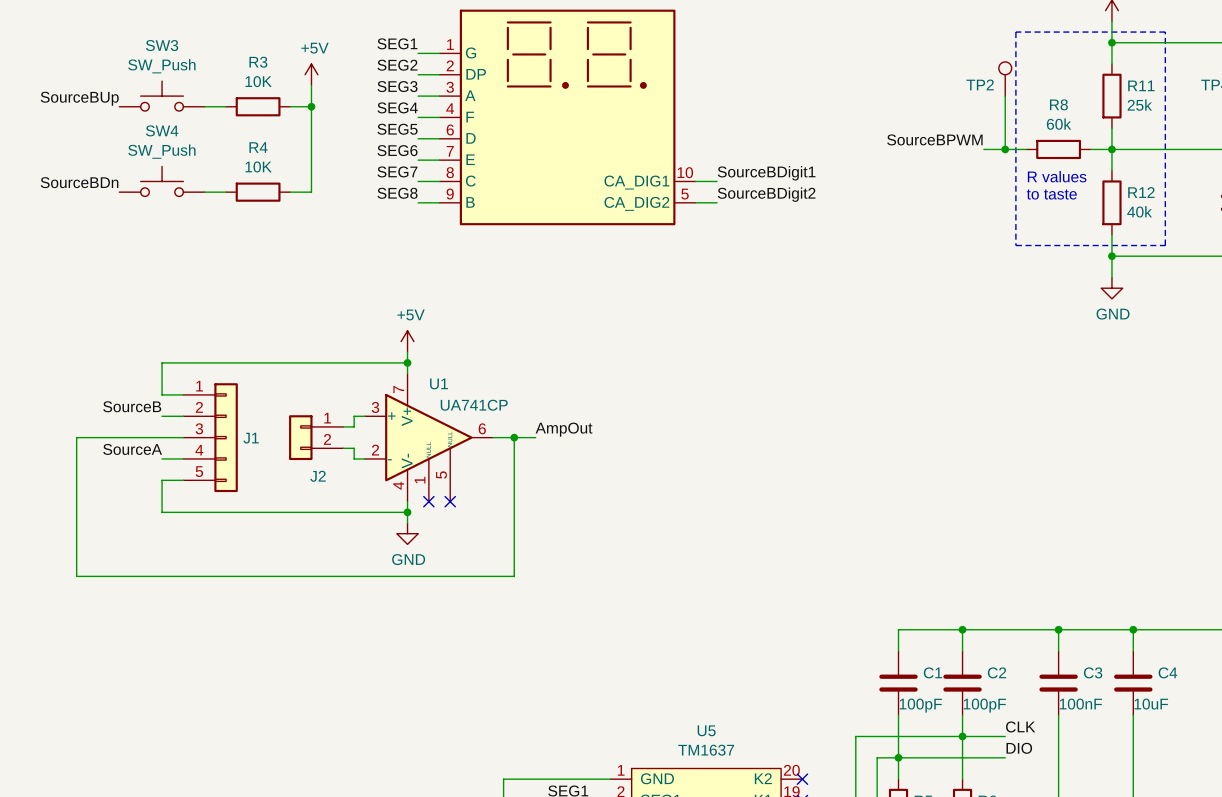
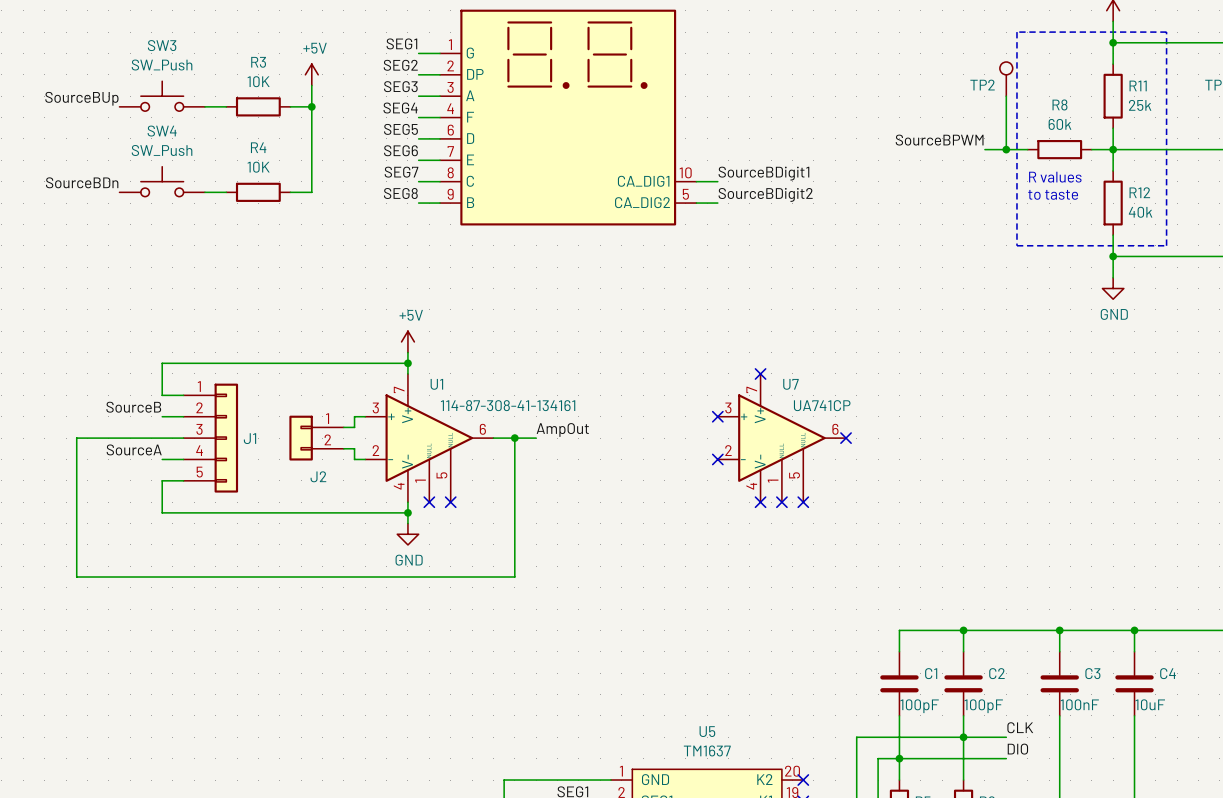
no-connect mark: none -> (760, 373)
U1 value: UA741CP (474, 405) -> 114-87-308-41-134161 (508, 405)
no-connect mark: none -> (717, 416)
U7: none -> UA741CP (781, 438)
no-connect mark: none -> (846, 438)
no-connect mark: none -> (717, 459)
no-connect mark: none -> (760, 502)
no-connect mark: none -> (781, 502)
no-connect mark: none -> (803, 502)

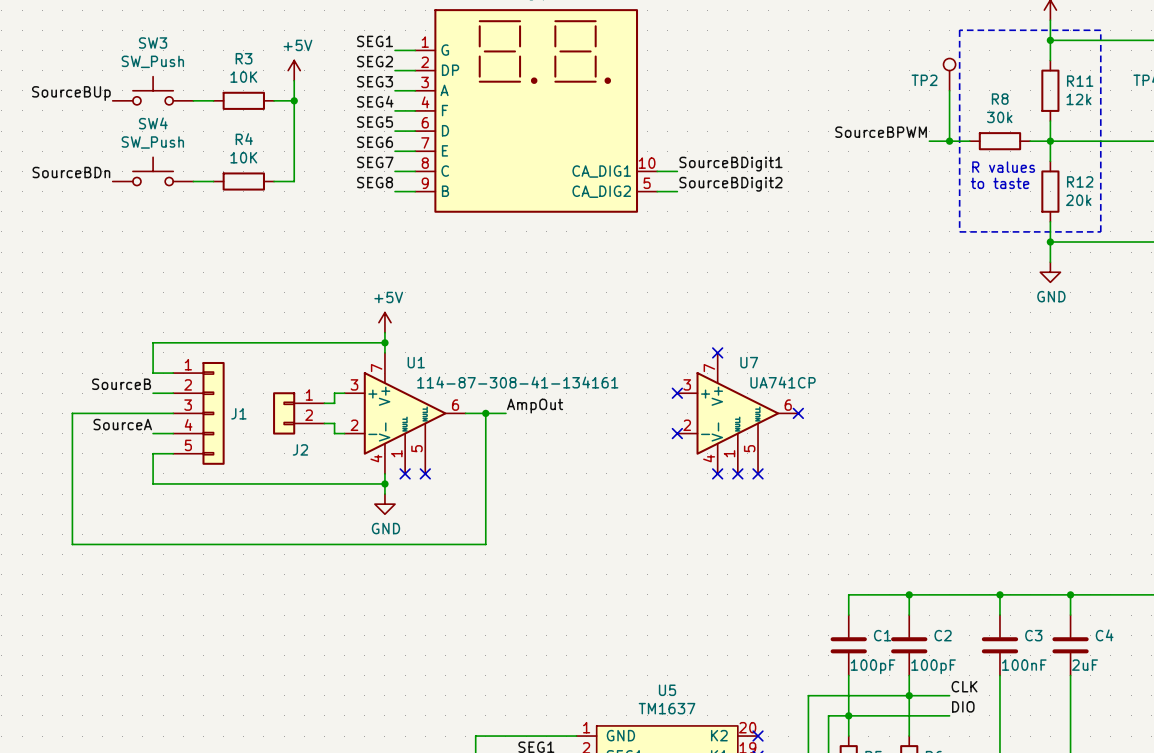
R11 value: 25k (1140, 105) -> 12k (1078, 99)
R8 value: 60k (1059, 124) -> 30k (999, 117)
R12 value: 40k (1140, 212) -> 20k (1078, 200)
C4 value: 10uF (1150, 704) -> 2uF (1085, 665)

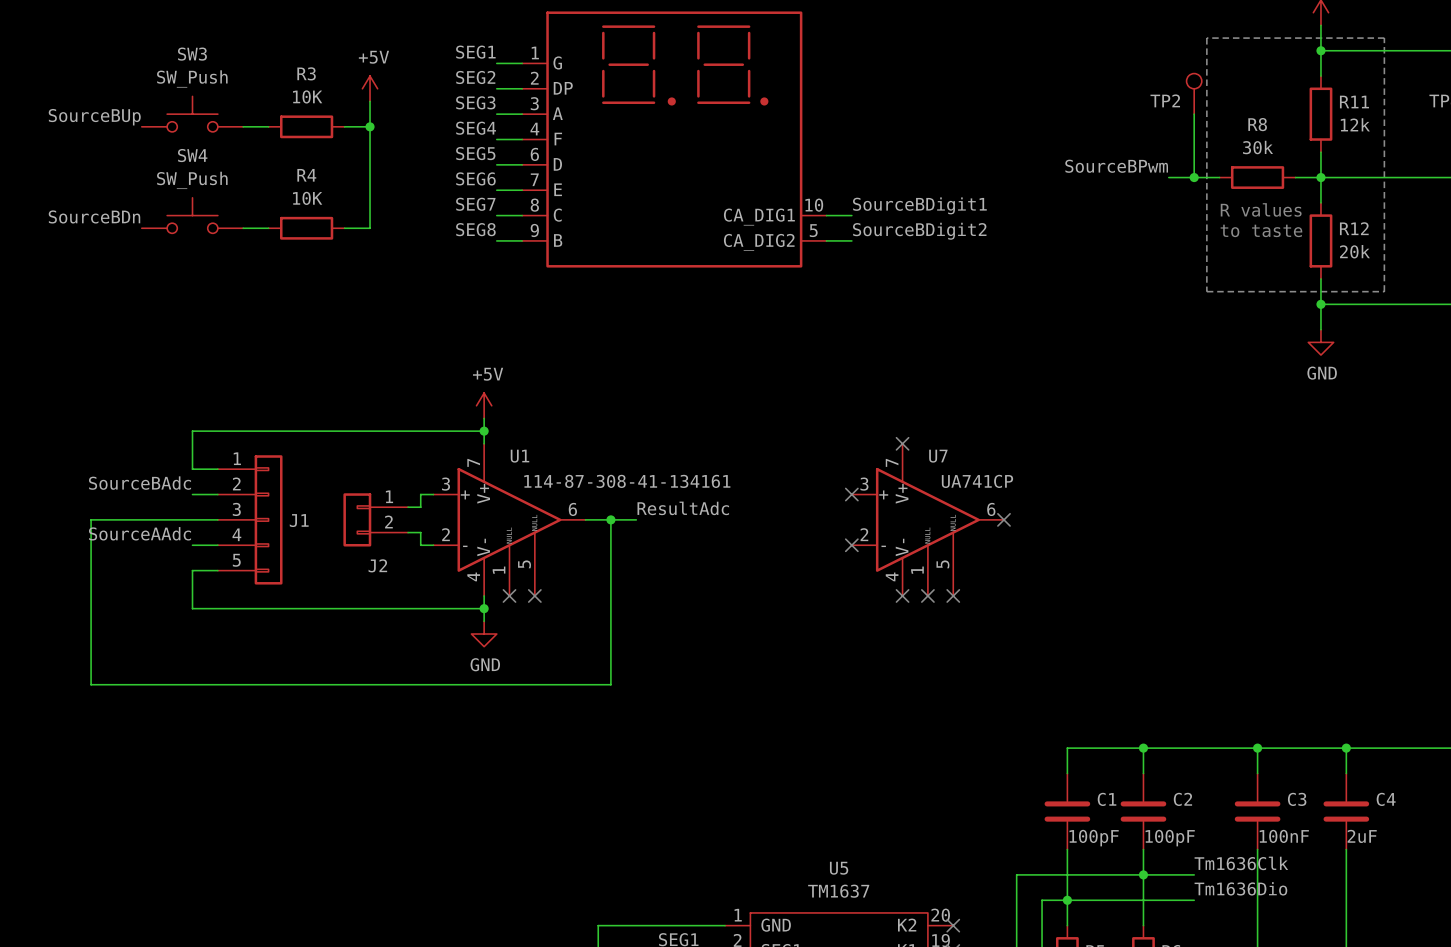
label: SourceBPWM (881, 132) -> SourceBPwm (1116, 166)
label: SourceB (121, 384) -> SourceBAdc (140, 483)
label: AmpOut (535, 406) -> ResultAdc (683, 508)
label: SourceA (122, 424) -> SourceAAdc (140, 533)
label: CLK (964, 686) -> Tm1636Clk (1241, 863)
label: DIO (963, 706) -> Tm1636Dio (1240, 888)

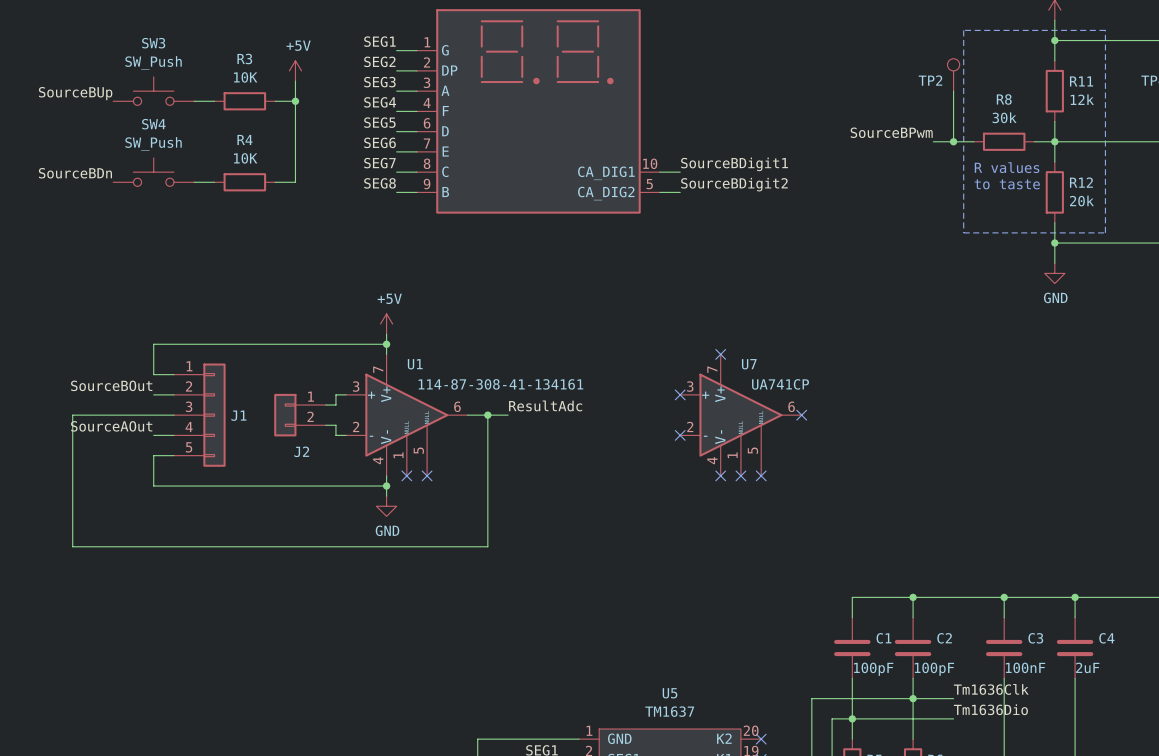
label: SourceBAdc (140, 483) -> SourceBOut (111, 385)
label: SourceAAdc (140, 533) -> SourceAOut (111, 426)

